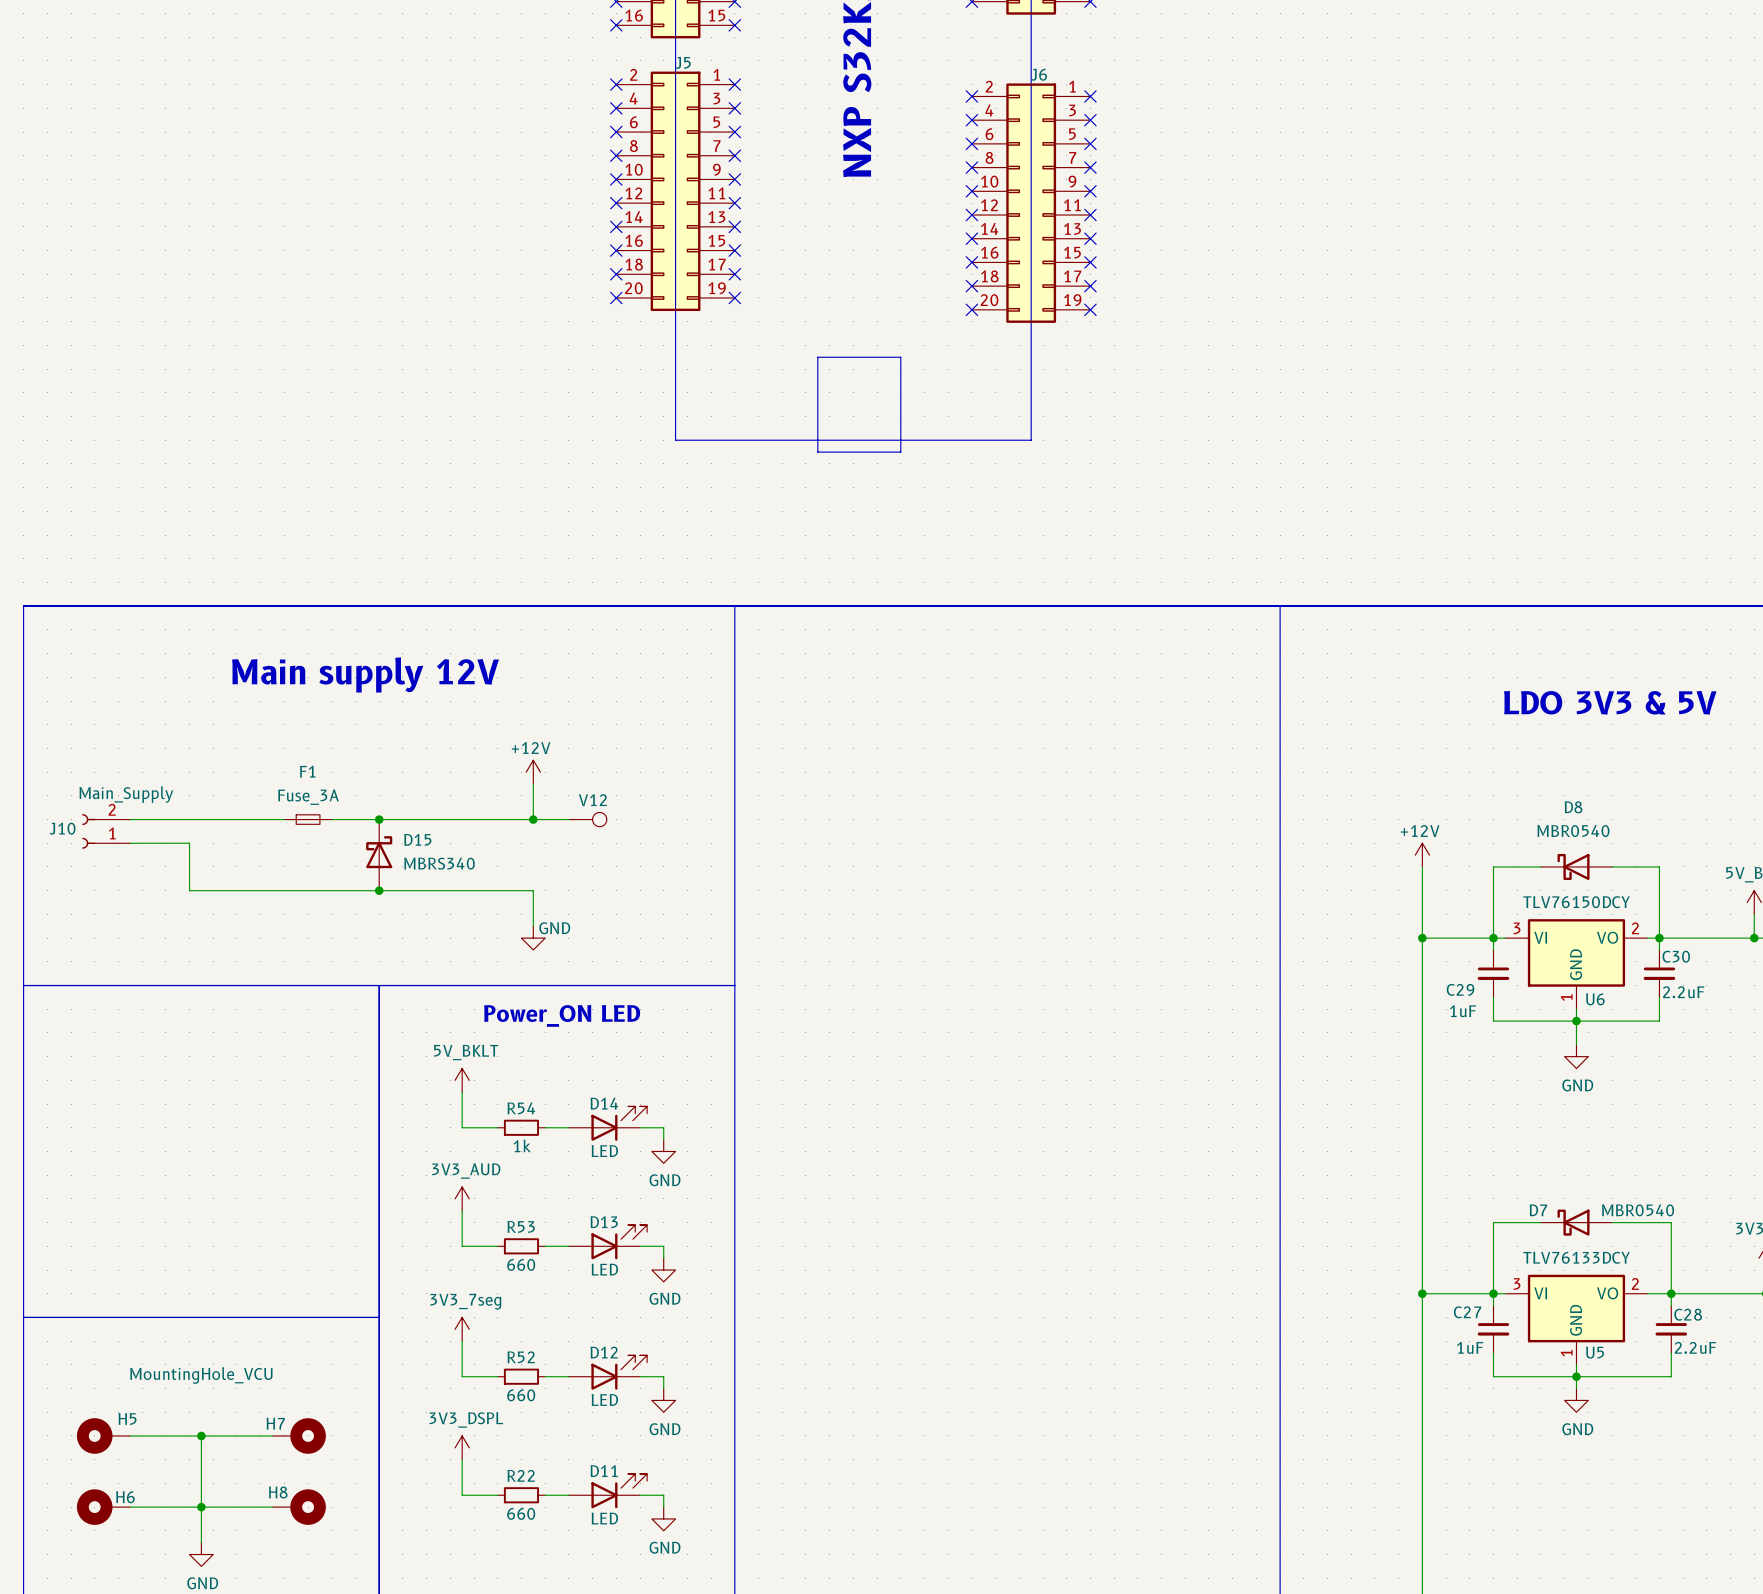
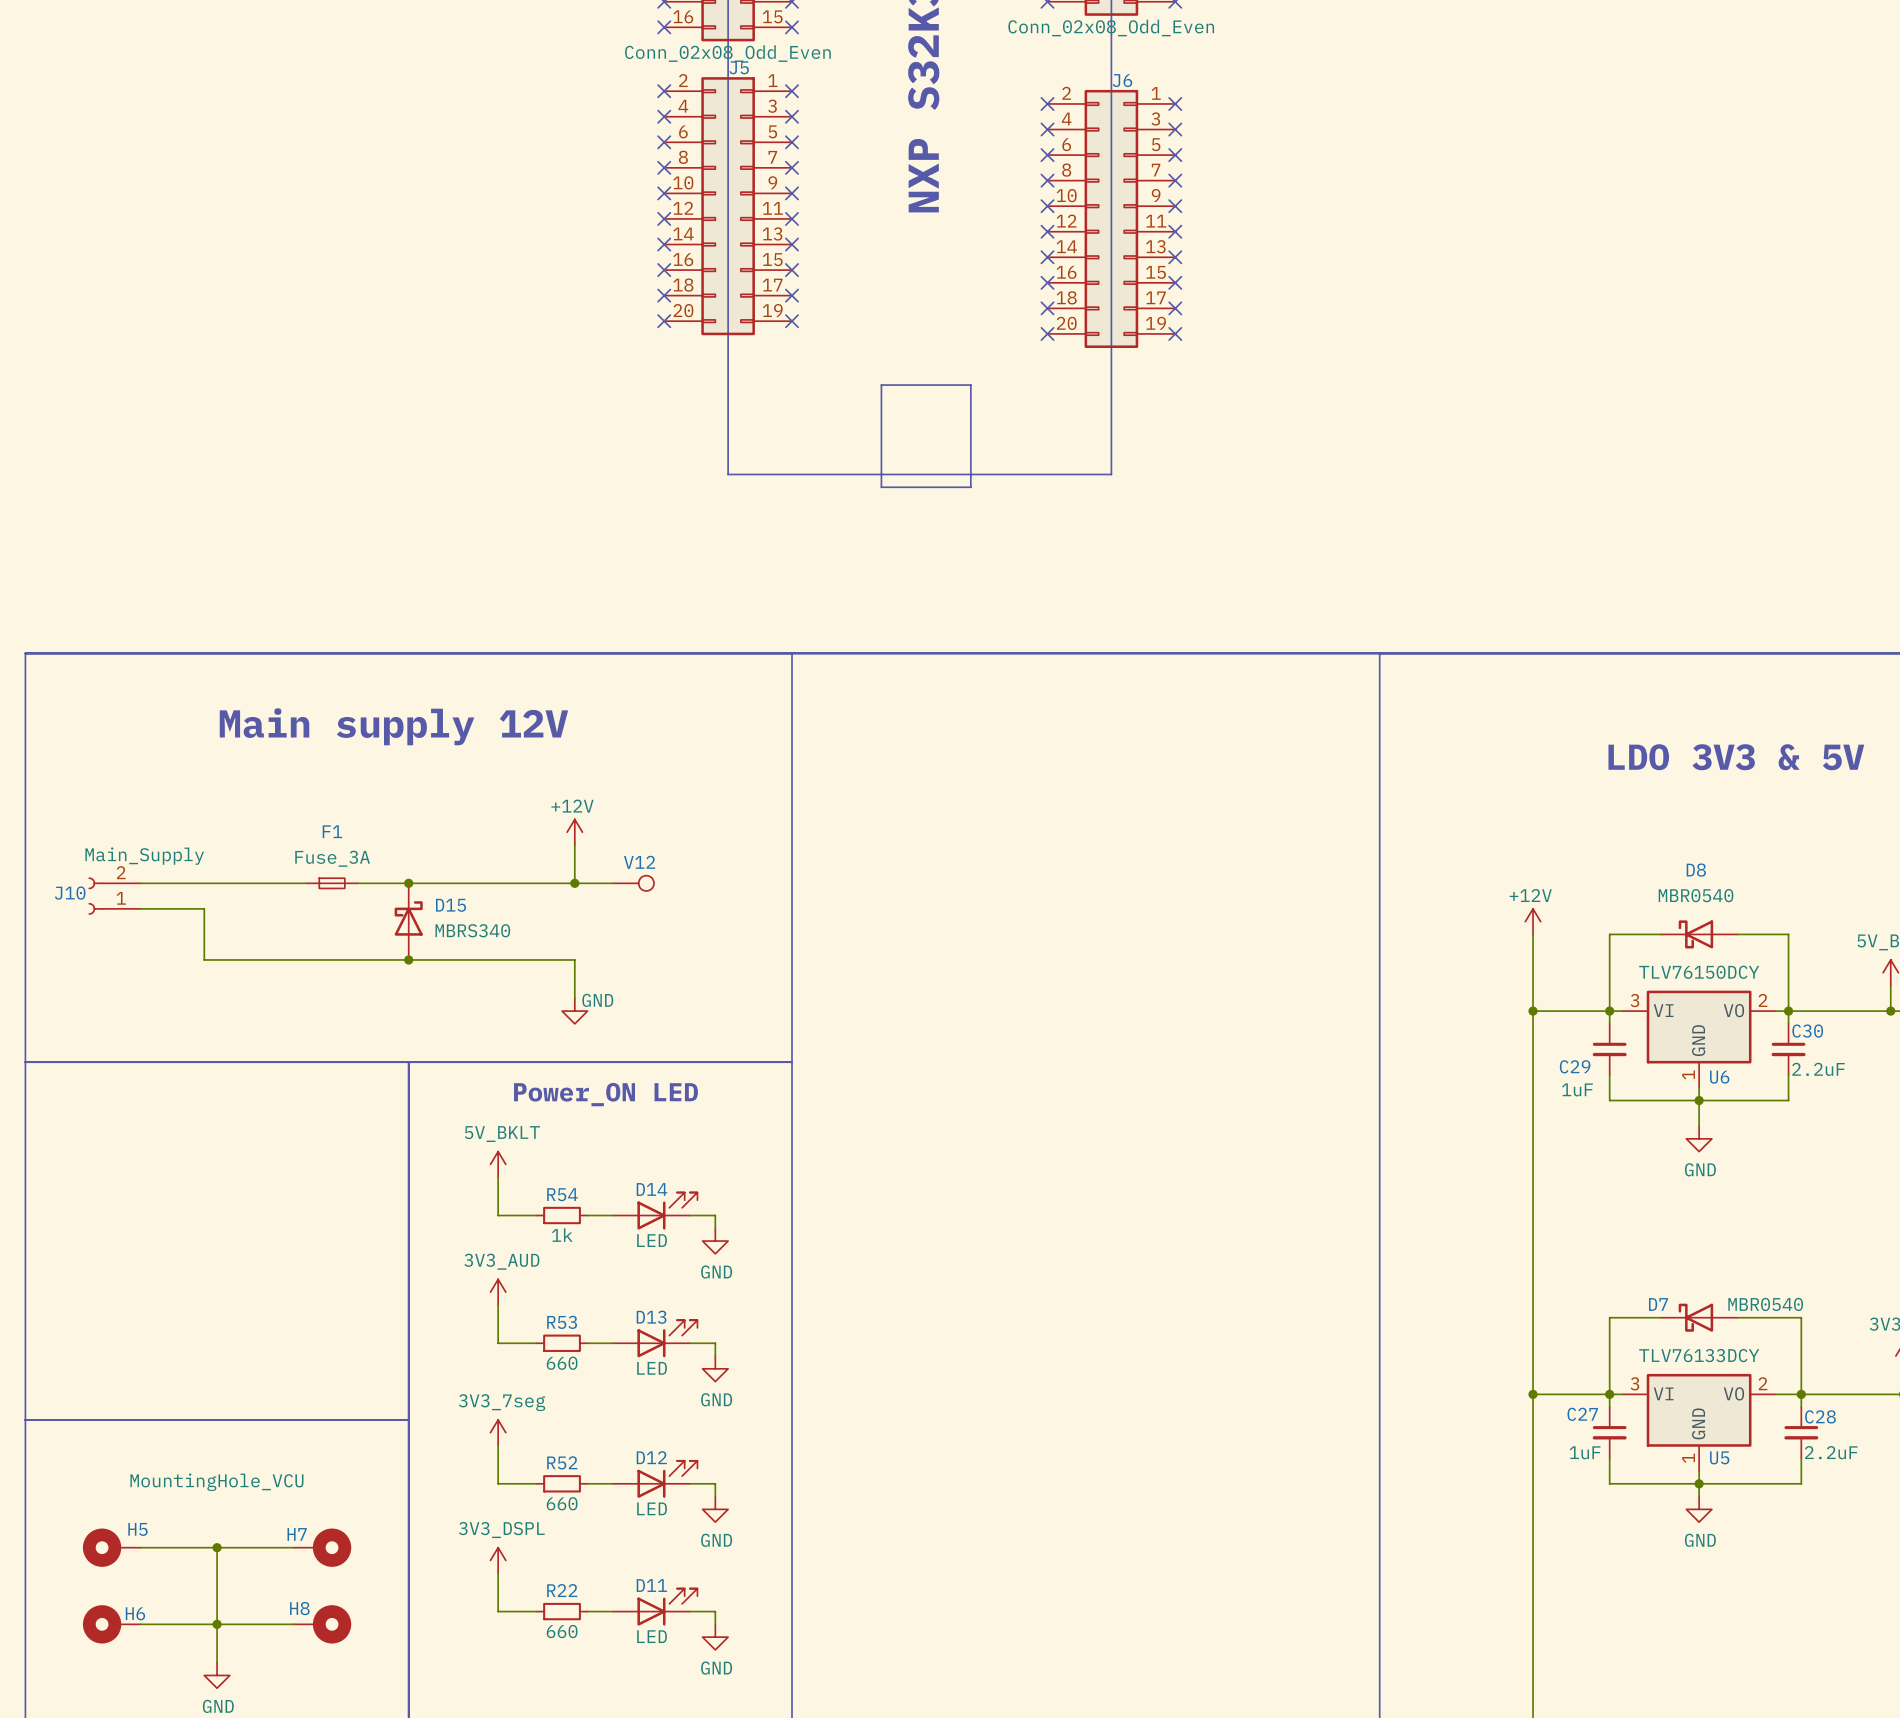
part value: none -> Conn_02x08_Odd_Even (1111, 28)
part value: none -> Conn_02x08_Odd_Even (727, 53)

